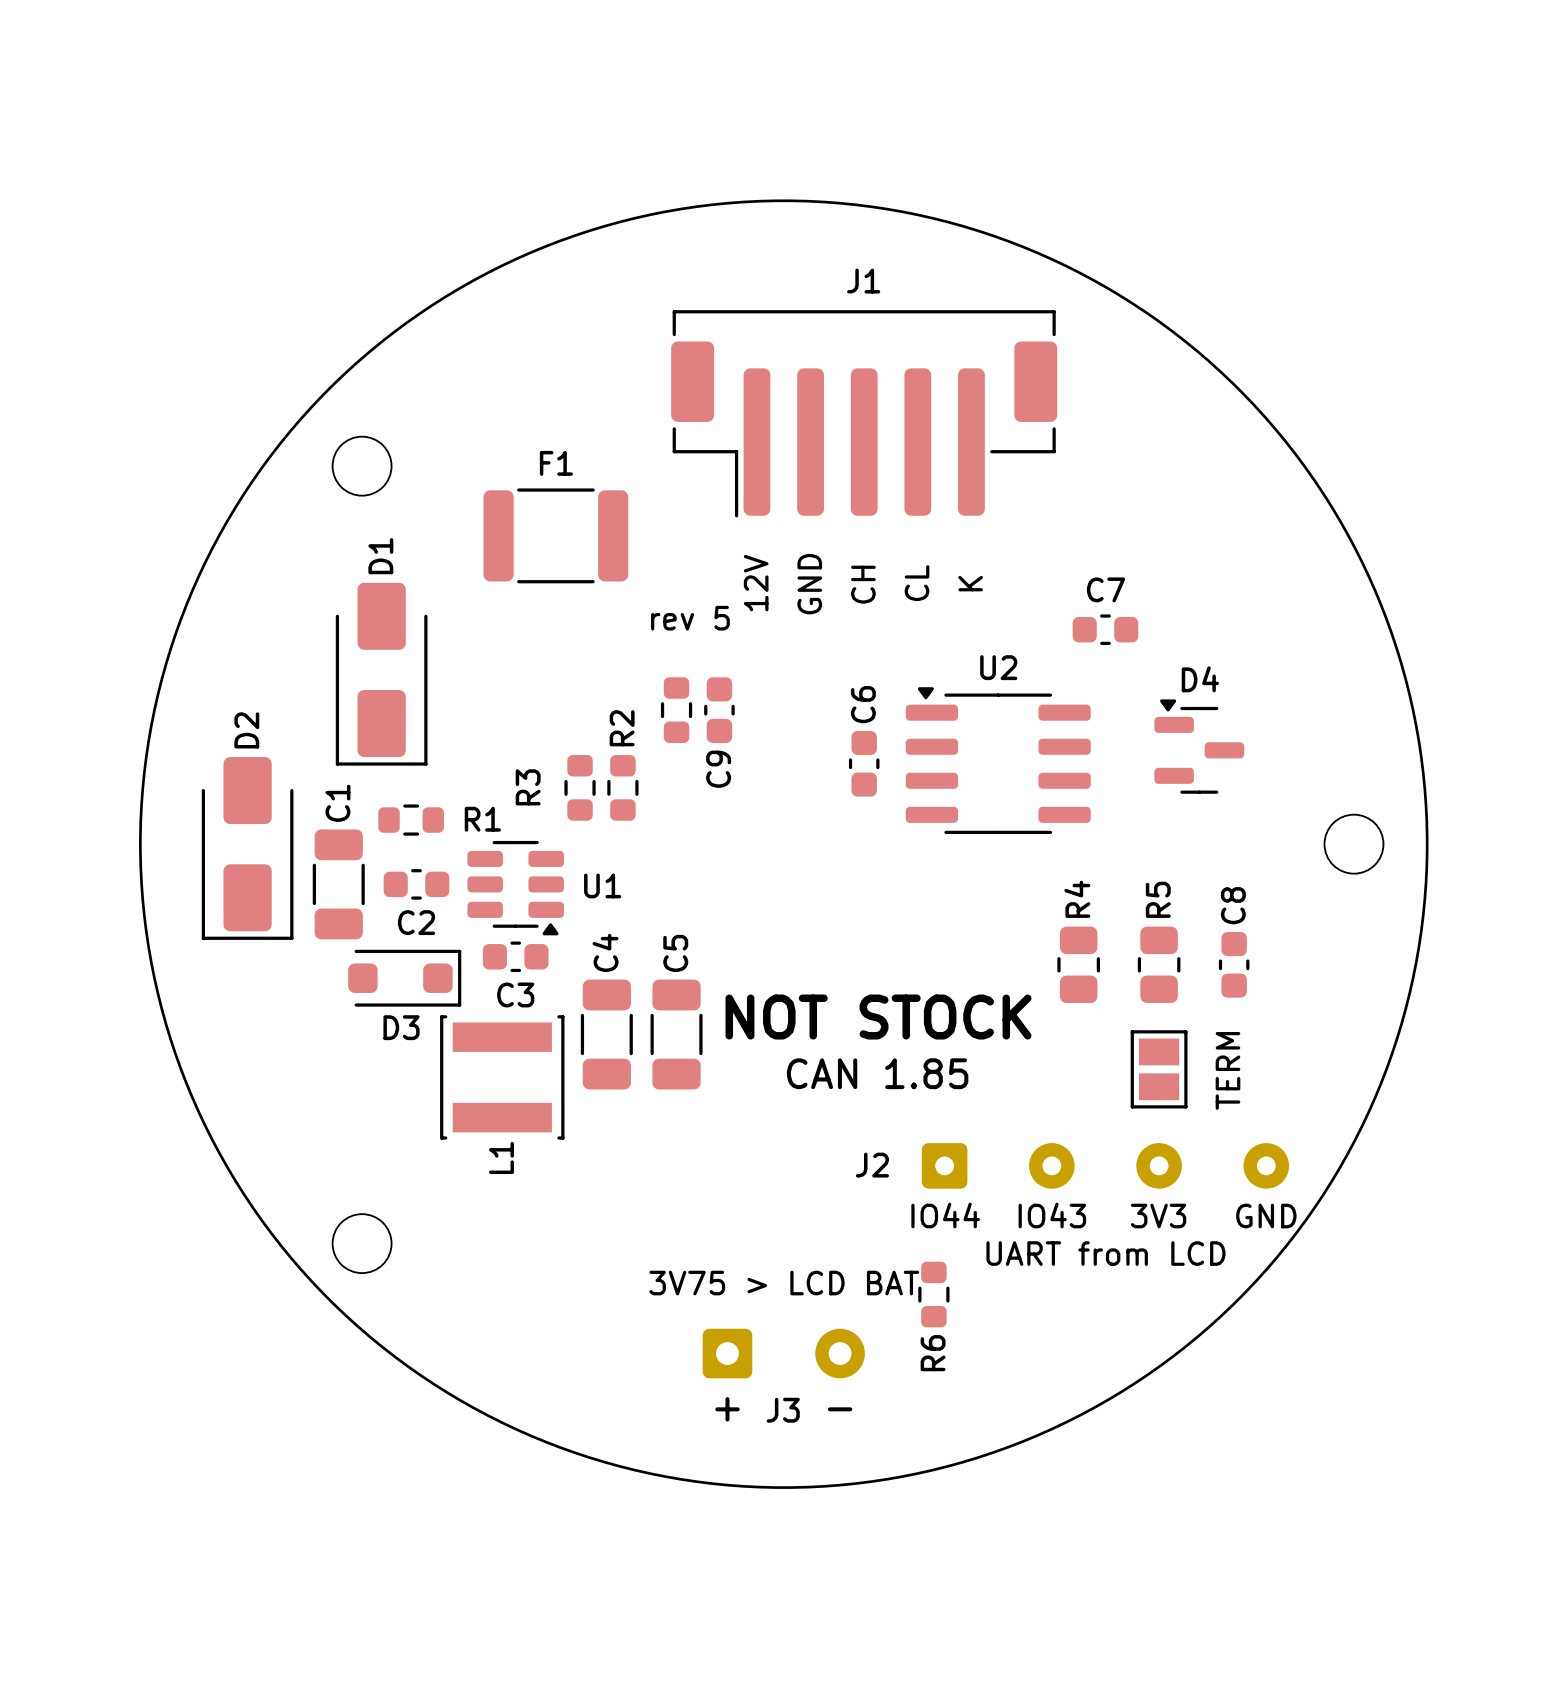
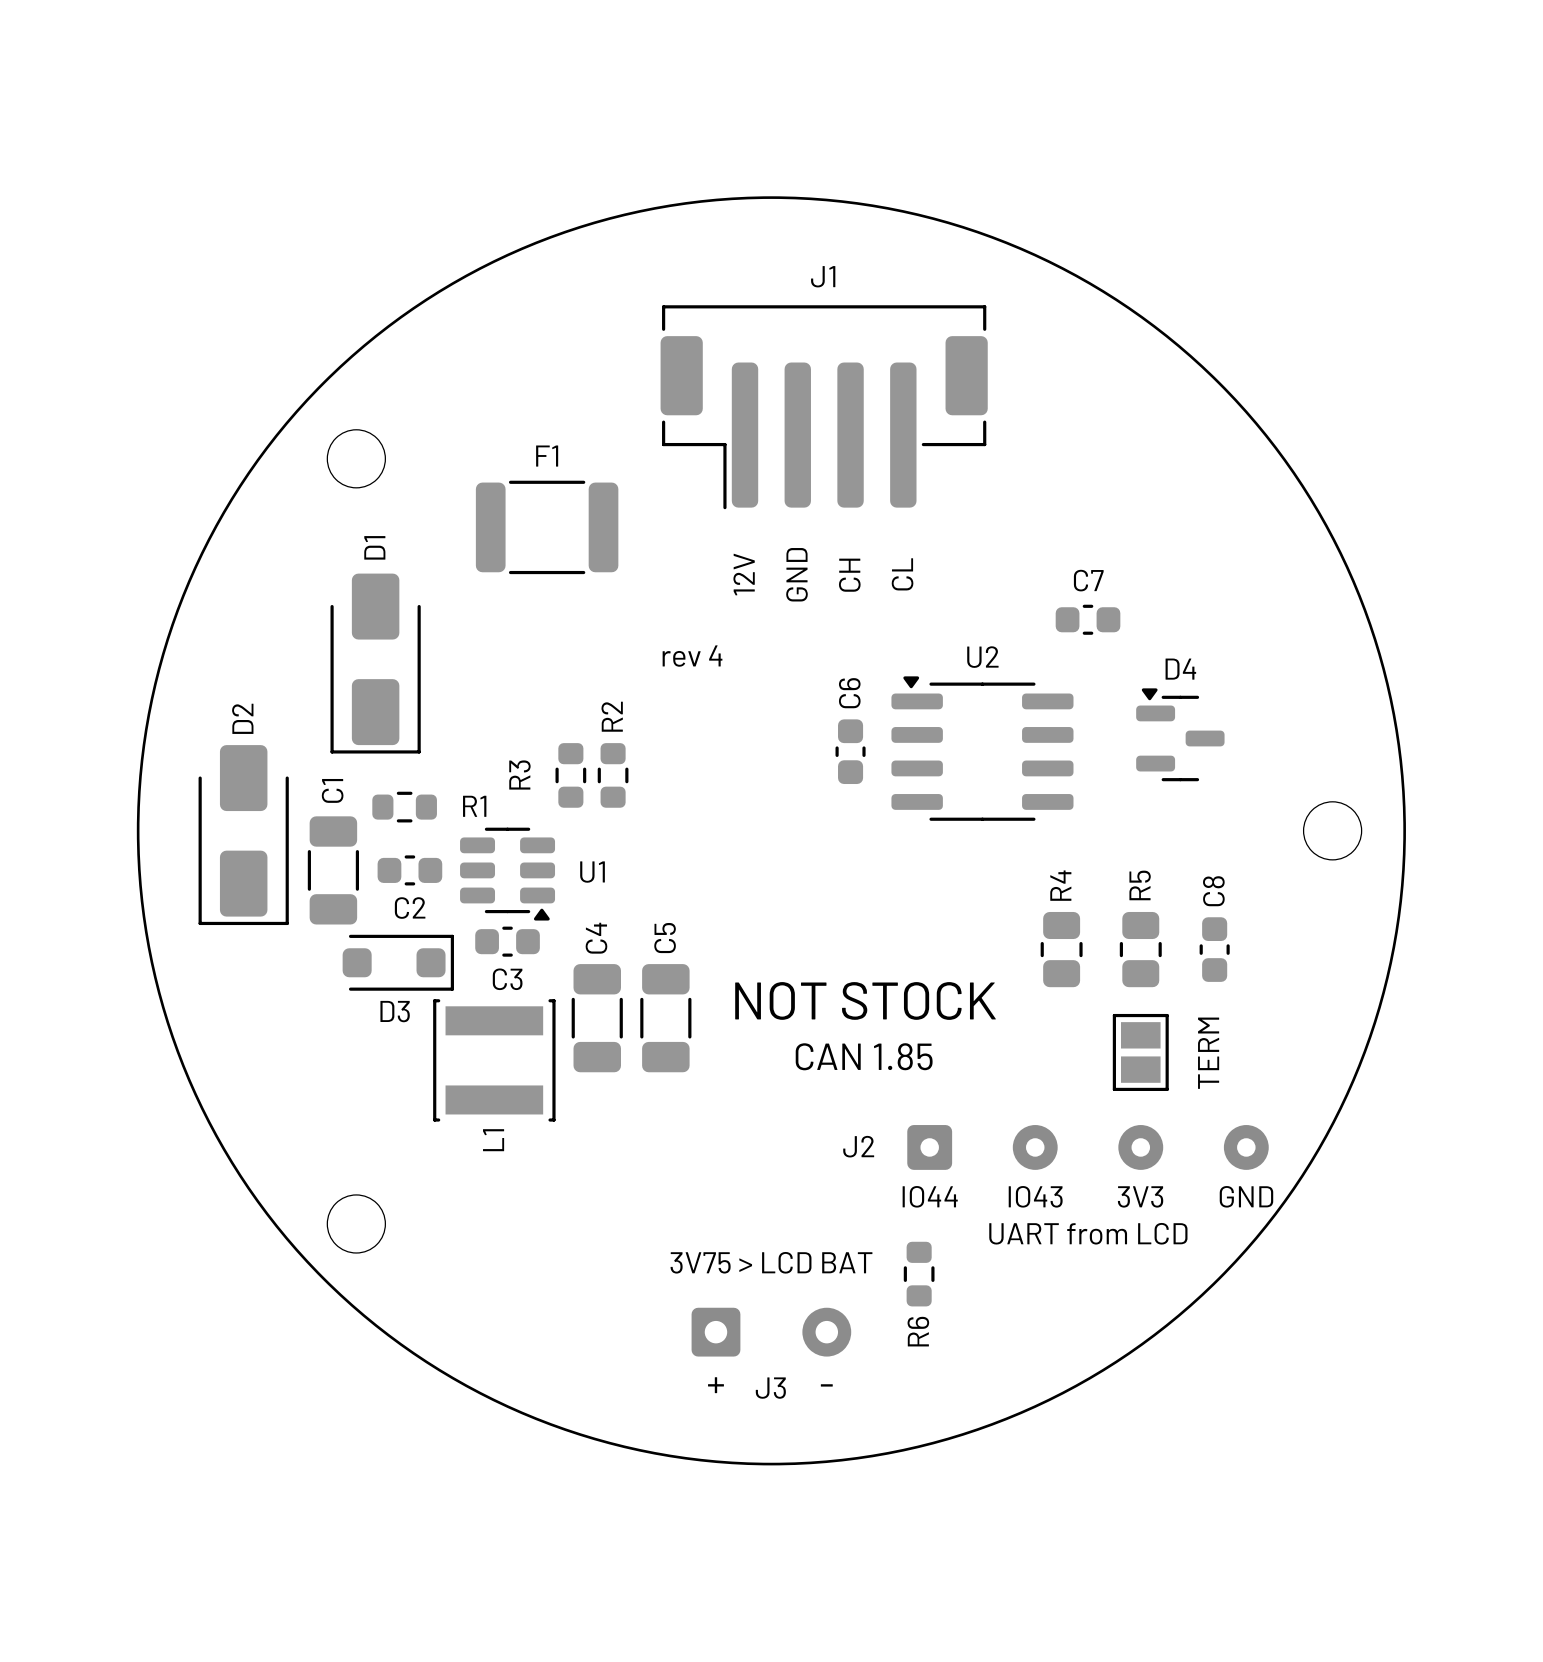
J1 footprint: [671, 310, 1058, 518] -> [660, 305, 988, 510]
text: K (970, 583) -> none
text: rev 5 (690, 618) -> none
text: none -> rev 4 (692, 656)
part: (676, 710) -> none
C9: (719, 710) -> none

